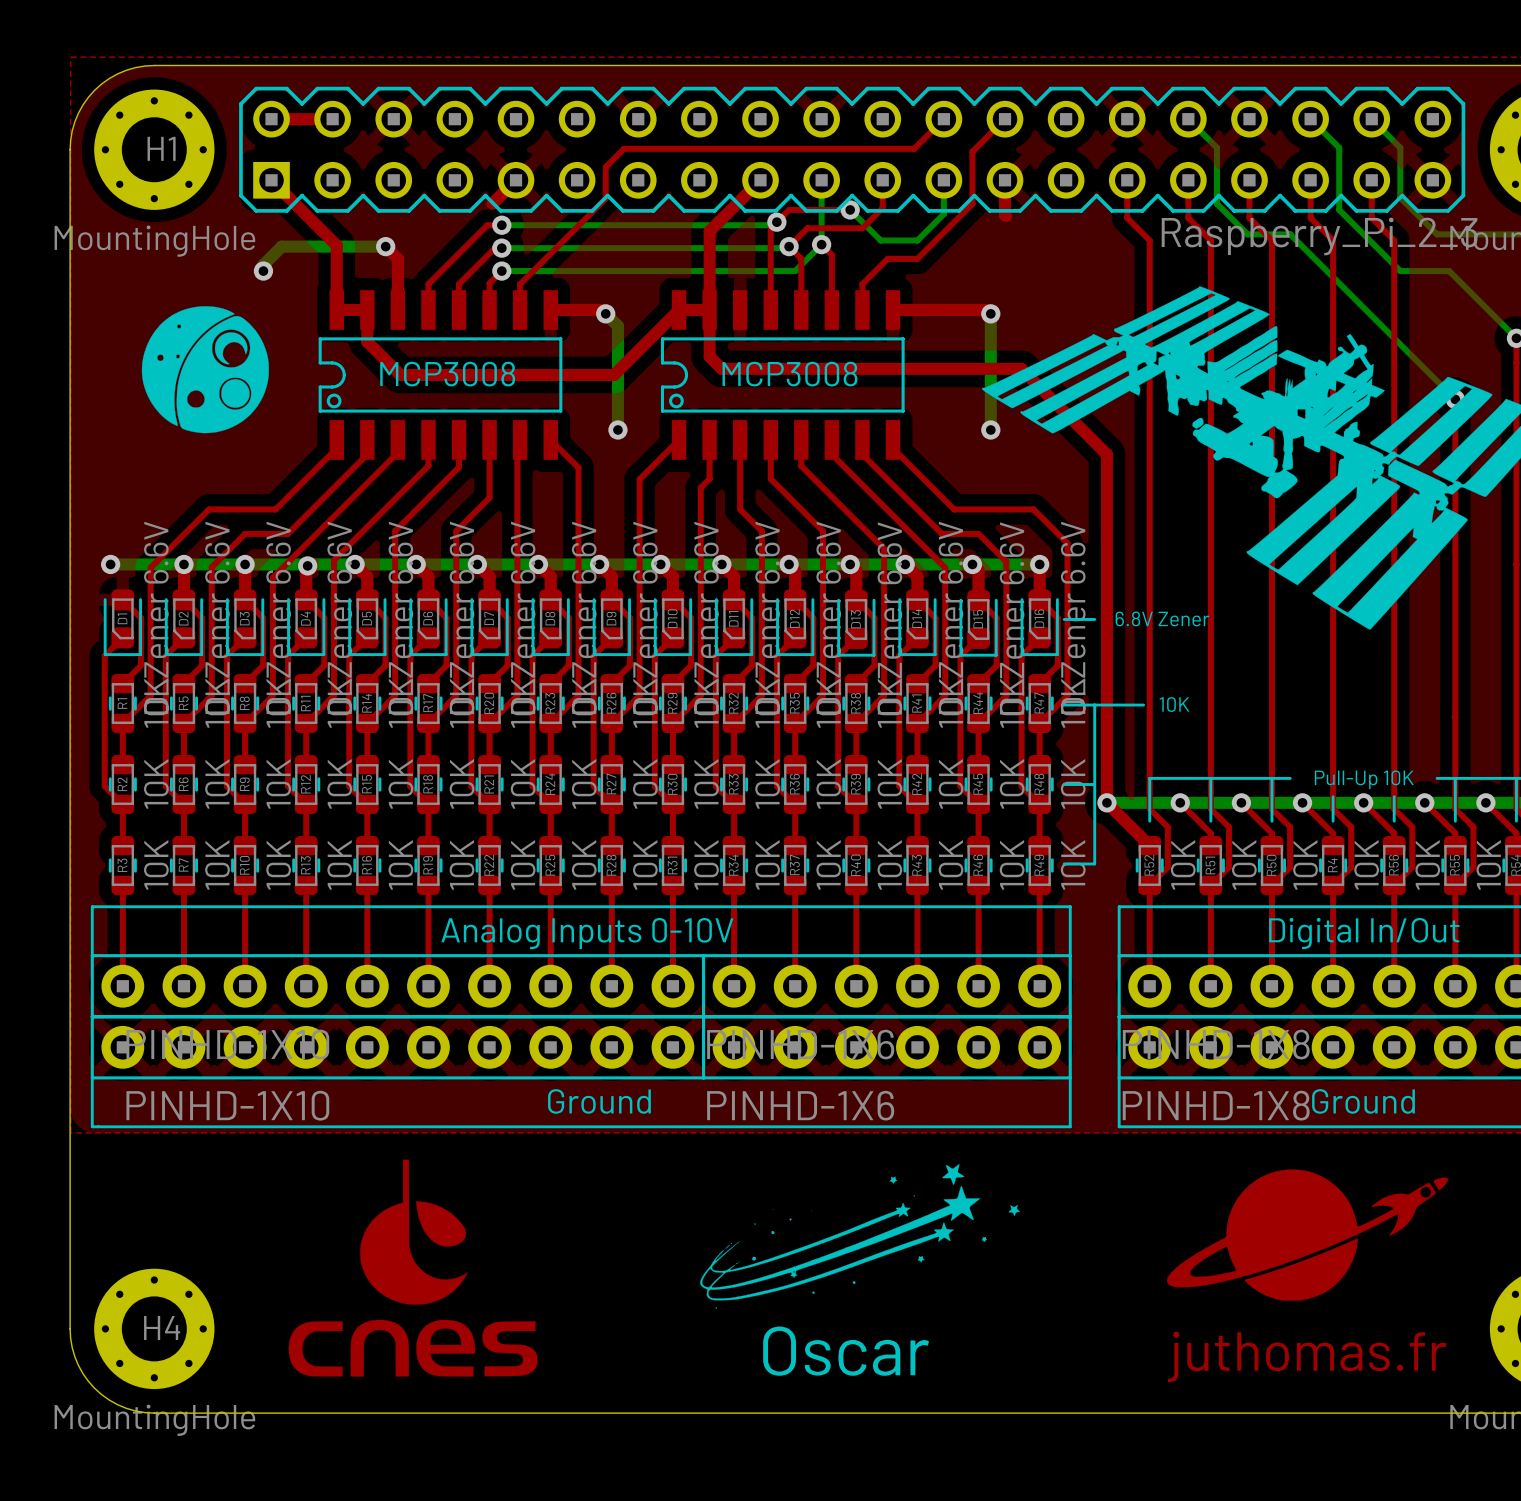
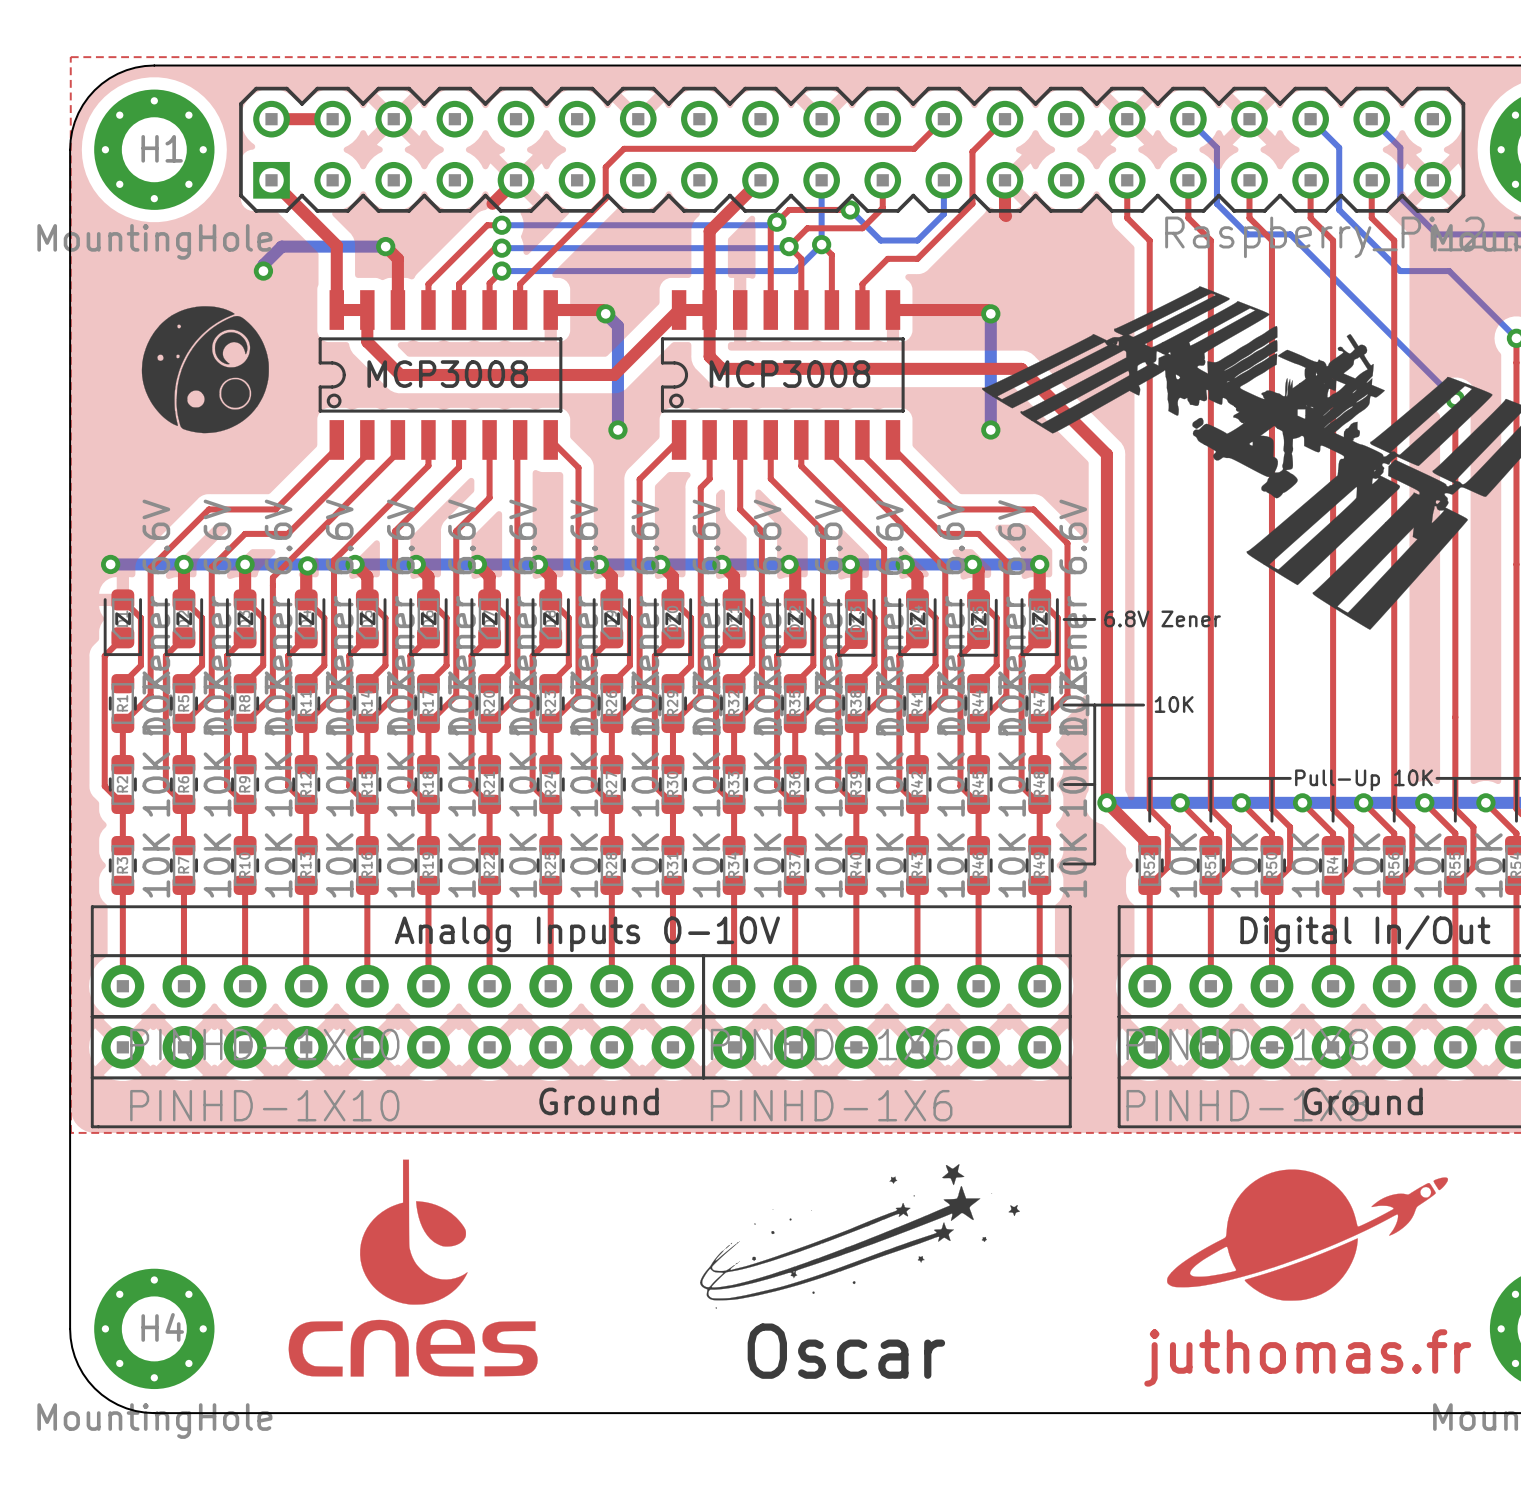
D1 text: none -> z (123, 618)
D2 text: none -> z (184, 618)
D3 text: none -> z (245, 618)
D4 text: none -> z (306, 618)
D5 text: none -> z (367, 618)
D6 text: none -> z (428, 618)
D7 text: none -> z (489, 618)
D8 text: none -> z (550, 618)
D9 text: none -> z (612, 618)
D10 text: none -> z (673, 618)
D11 text: none -> z (734, 618)
D12 text: none -> z (795, 618)
D14 text: none -> z (917, 618)
D16 text: none -> z (1039, 618)
D13 text: none -> z (856, 619)
D15 text: none -> z (978, 619)

